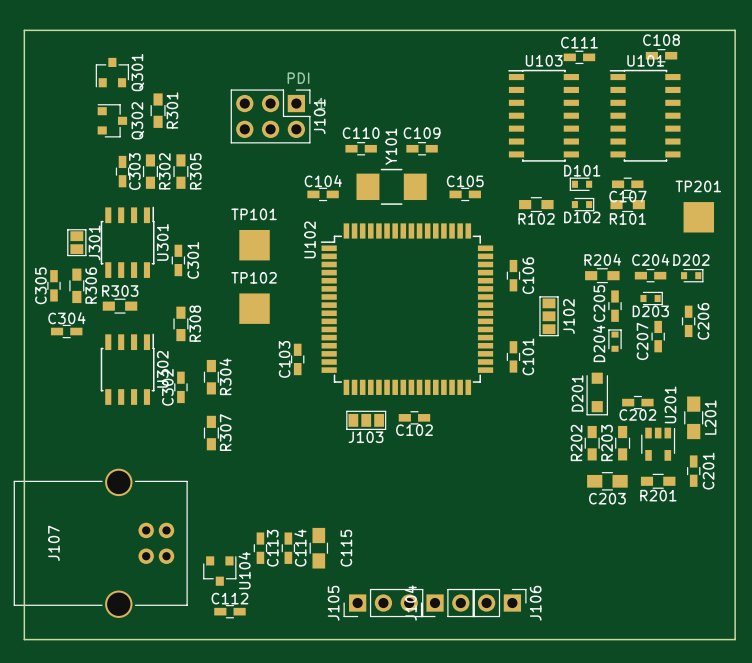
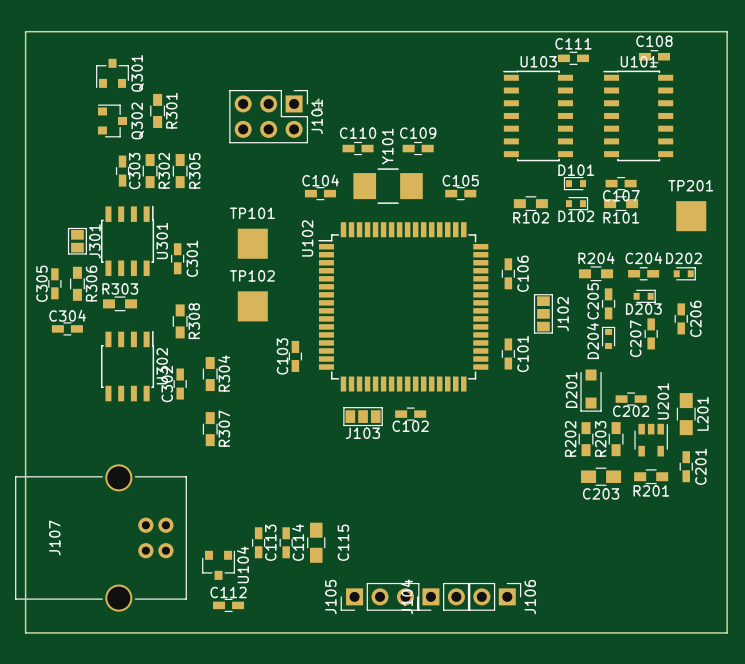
text: PDI (298, 78) -> none

